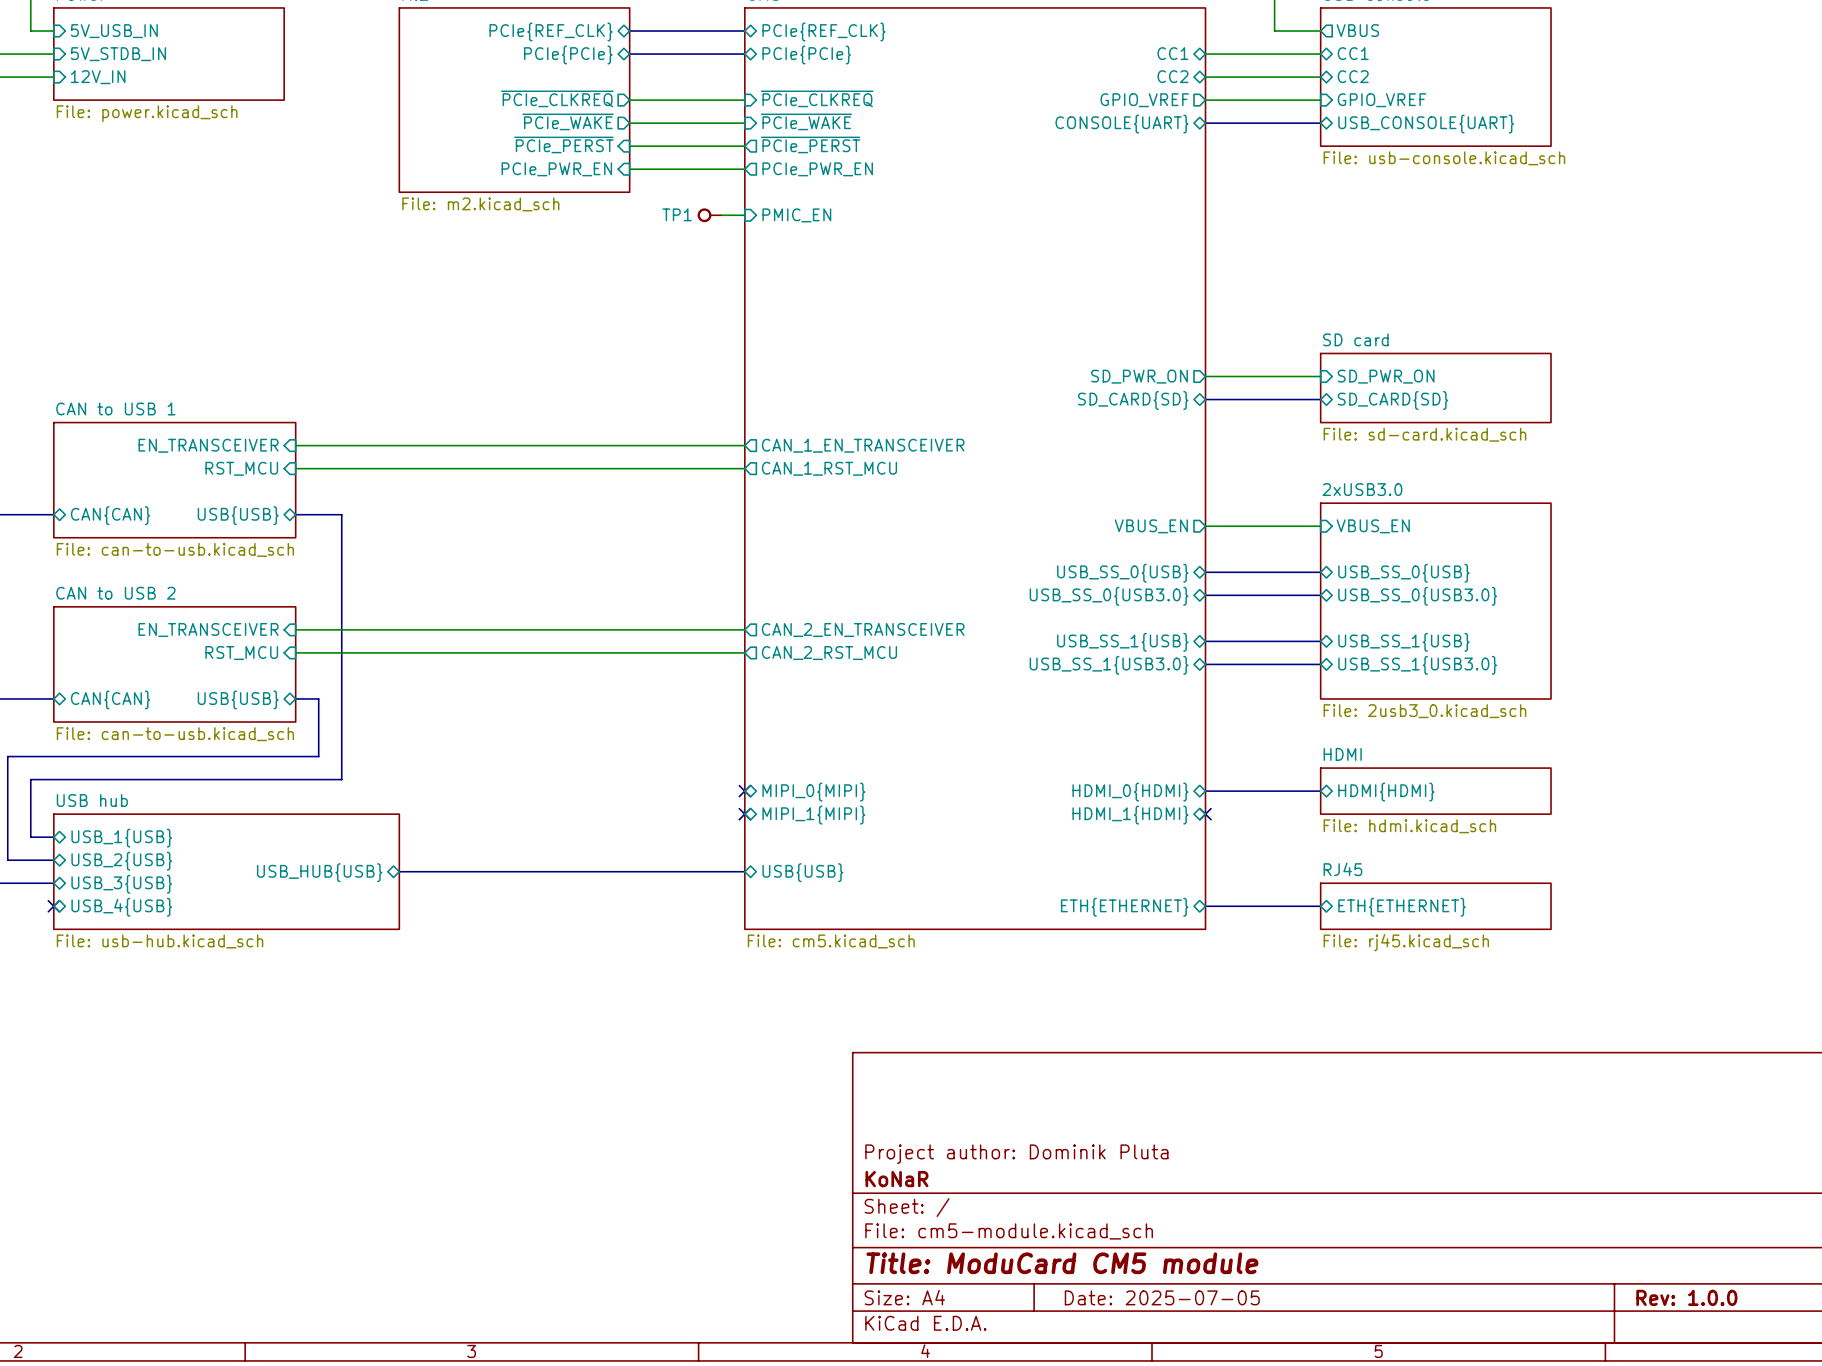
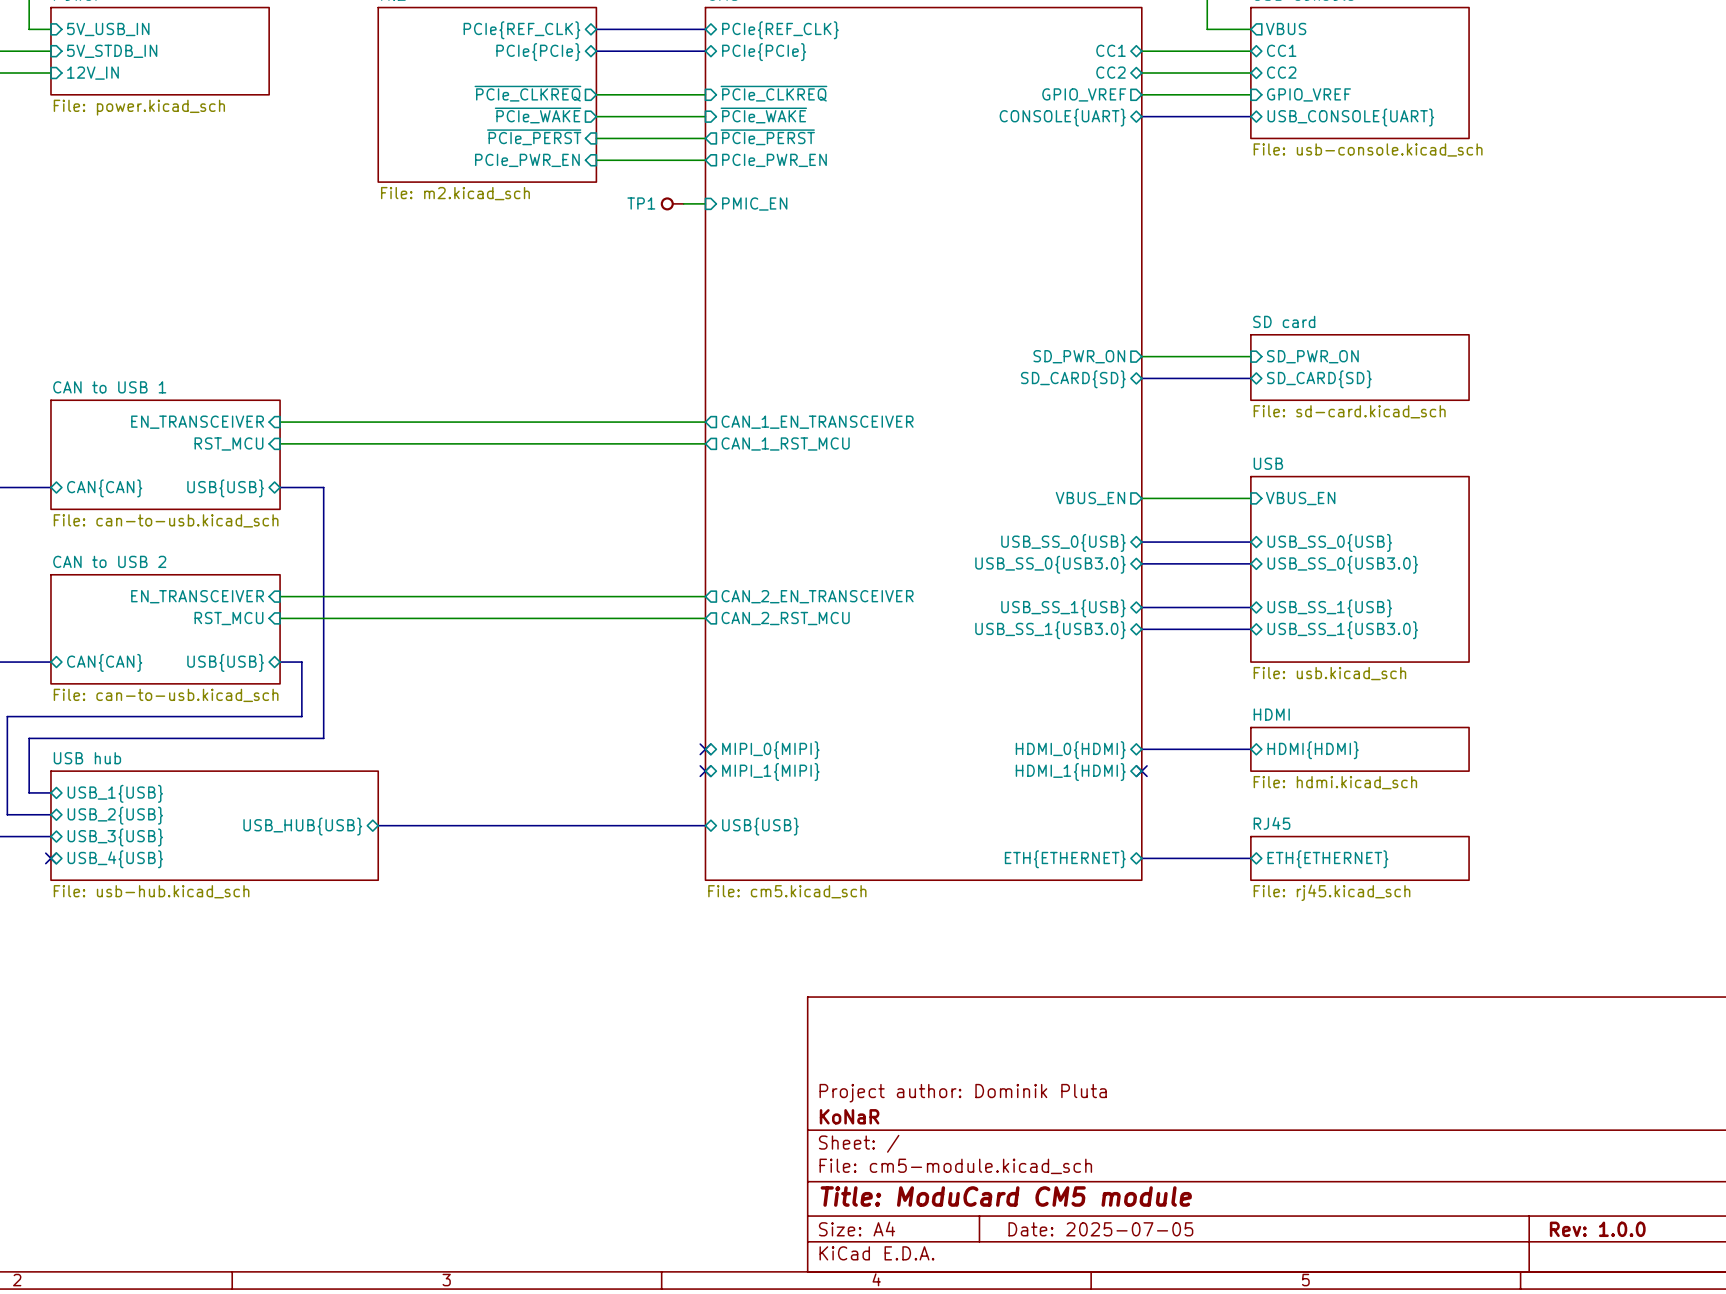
sheet 2xUSB3.0 name: 2xUSB3.0 (1362, 489) -> USB (1268, 463)
sheet 2xUSB3.0 value: File: 2usb3_0.kicad_sch (1424, 711) -> File: usb.kicad_sch (1329, 673)

